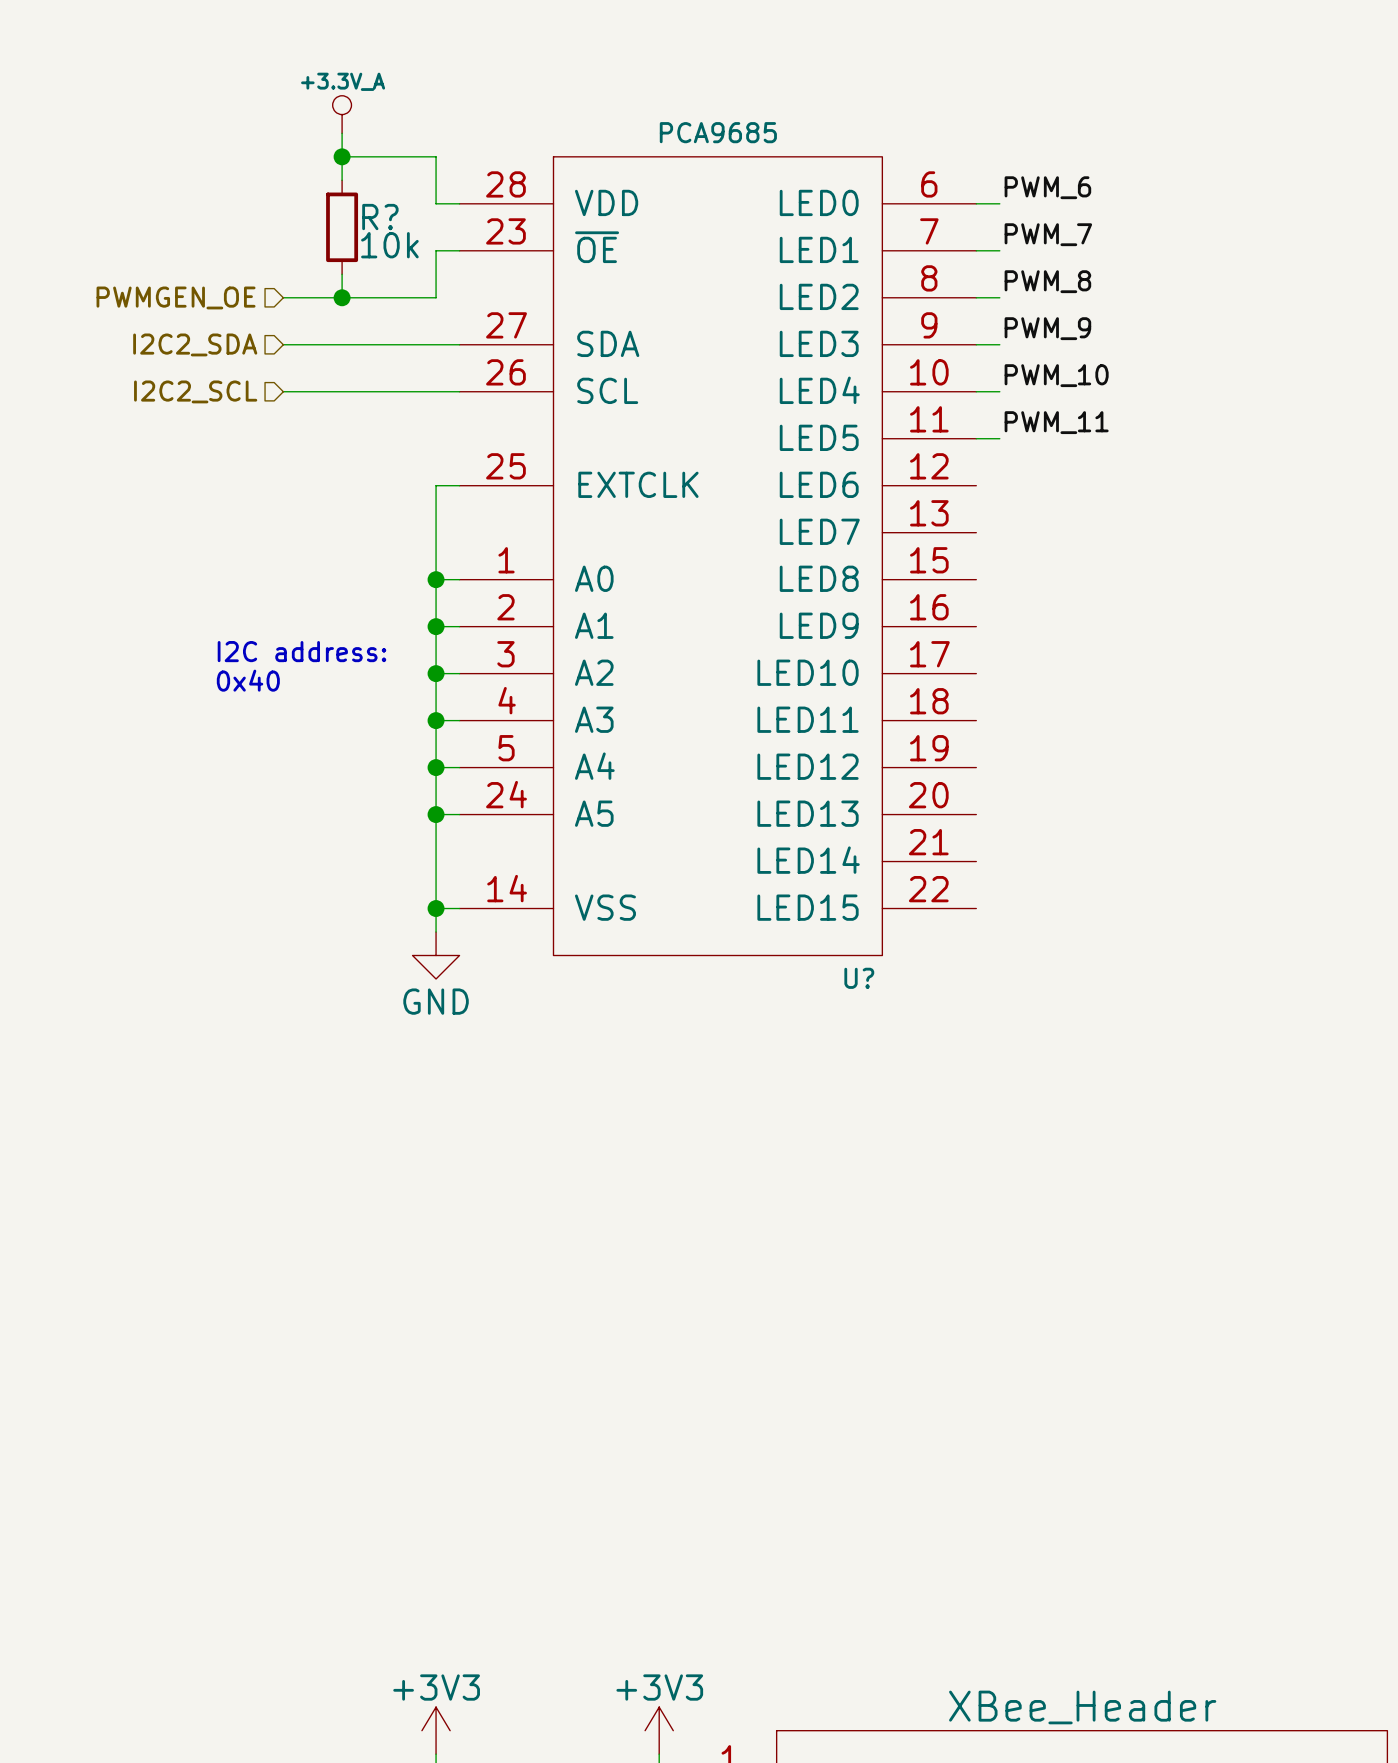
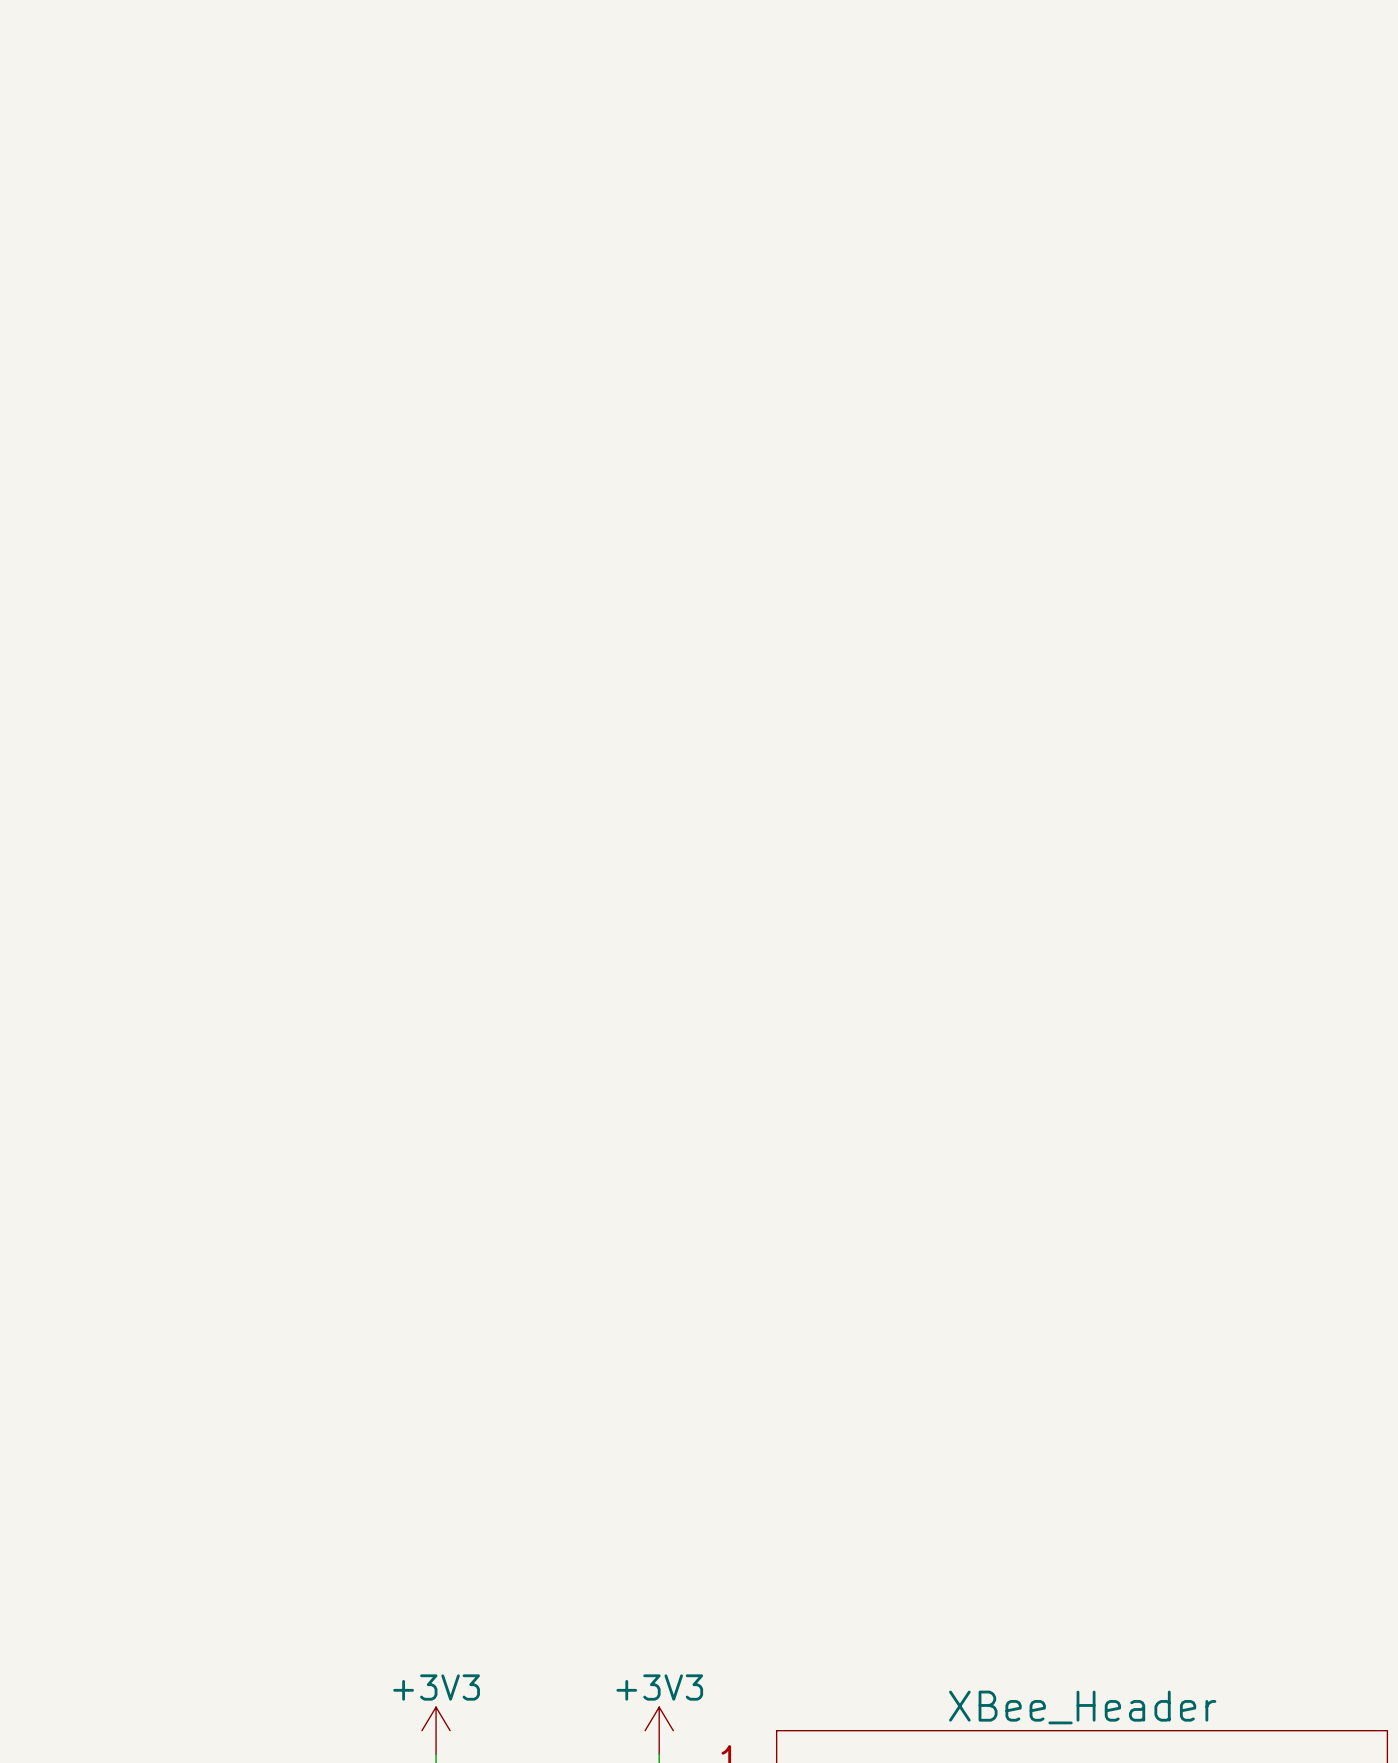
power symbol: +3.3V_A (342, 114) -> none
wire: (342, 133) (342, 180) -> none
wire: (342, 156) (436, 156) (436, 203) (459, 203) -> none
junction: (342, 156) -> none
label: PWM_6 (1047, 187) -> none
wire: (976, 203) (999, 203) -> none
R?: 10k (342, 227) -> none
label: PWM_7 (1048, 234) -> none
wire: (459, 250) (436, 250) (436, 297) (283, 297) -> none
wire: (976, 250) (999, 250) -> none
wire: (342, 274) (342, 297) -> none
label: PWM_8 (1047, 281) -> none
hierarchical label: PWMGEN_OE (176, 297) -> none
junction: (342, 297) -> none
wire: (976, 297) (999, 297) -> none
label: PWM_9 (1047, 328) -> none
hierarchical label: I2C2_SDA (195, 344) -> none
wire: (283, 344) (459, 344) -> none
wire: (976, 344) (999, 344) -> none
label: PWM_10 (1056, 375) -> none
hierarchical label: I2C2_SCL (195, 391) -> none
wire: (283, 391) (459, 391) -> none
wire: (976, 391) (999, 391) -> none
label: PWM_11 (1056, 422) -> none
wire: (976, 438) (999, 438) -> none
wire: (459, 485) (436, 485) (436, 932) -> none
U?: PCA9685 (717, 556) -> none
wire: (436, 579) (459, 579) -> none
junction: (436, 579) -> none
wire: (436, 626) (459, 626) -> none
junction: (436, 626) -> none
text: I2C address: (301, 651) -> none
wire: (436, 673) (459, 673) -> none
junction: (436, 673) -> none
text: 0x40 (248, 680) -> none
wire: (436, 720) (459, 720) -> none
junction: (436, 720) -> none
wire: (436, 767) (459, 767) -> none
junction: (436, 767) -> none
wire: (436, 814) (459, 814) -> none
junction: (436, 814) -> none
wire: (436, 908) (459, 908) -> none
junction: (436, 908) -> none
power symbol: GND (436, 955) -> none

